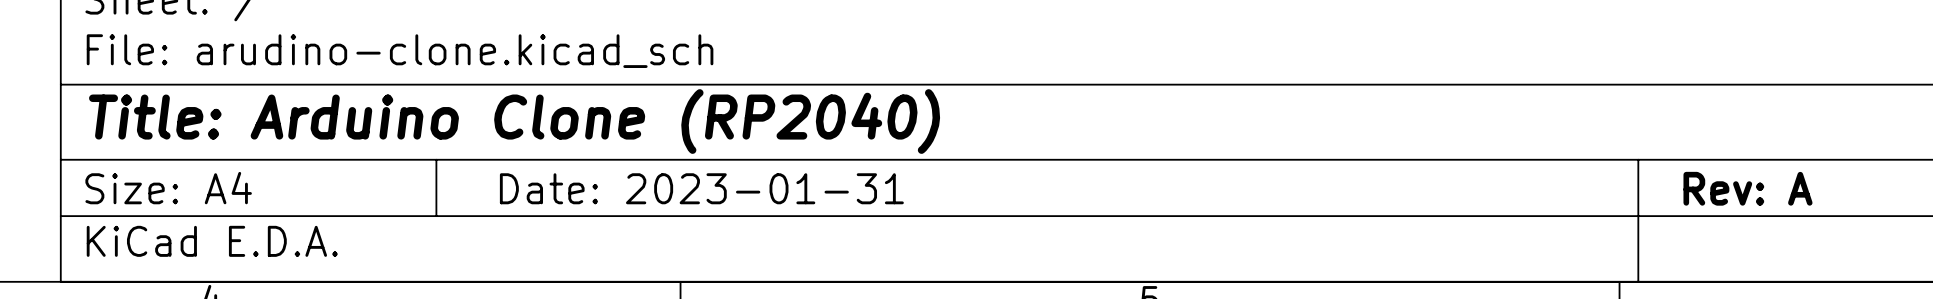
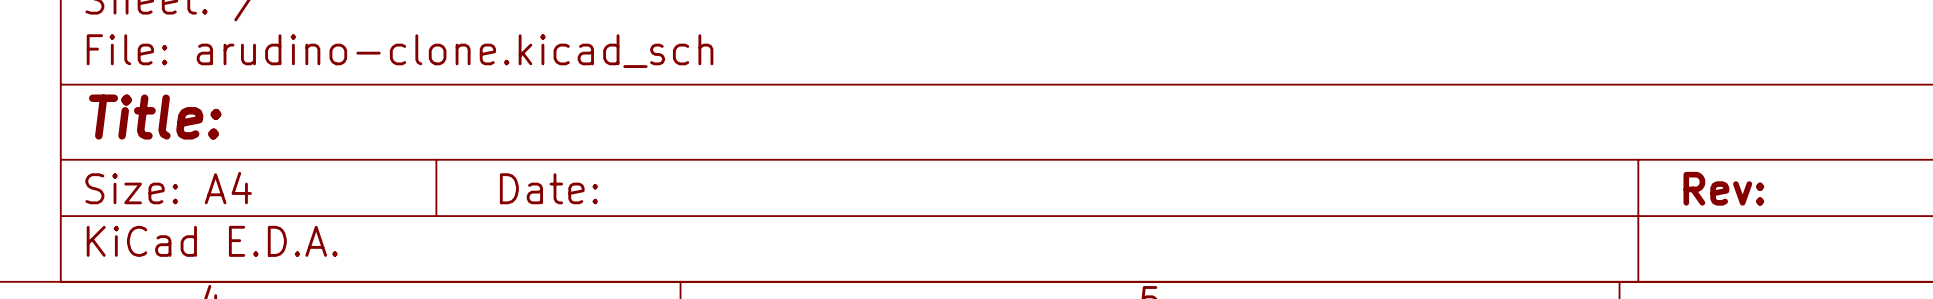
title block: Title: Arduino Clone (RP2040) (514, 121) -> Title: (155, 117)
title block: Date: 2023-01-31 (701, 188) -> Date: (548, 188)
title block: Rev: A (1747, 188) -> Rev: (1723, 188)

